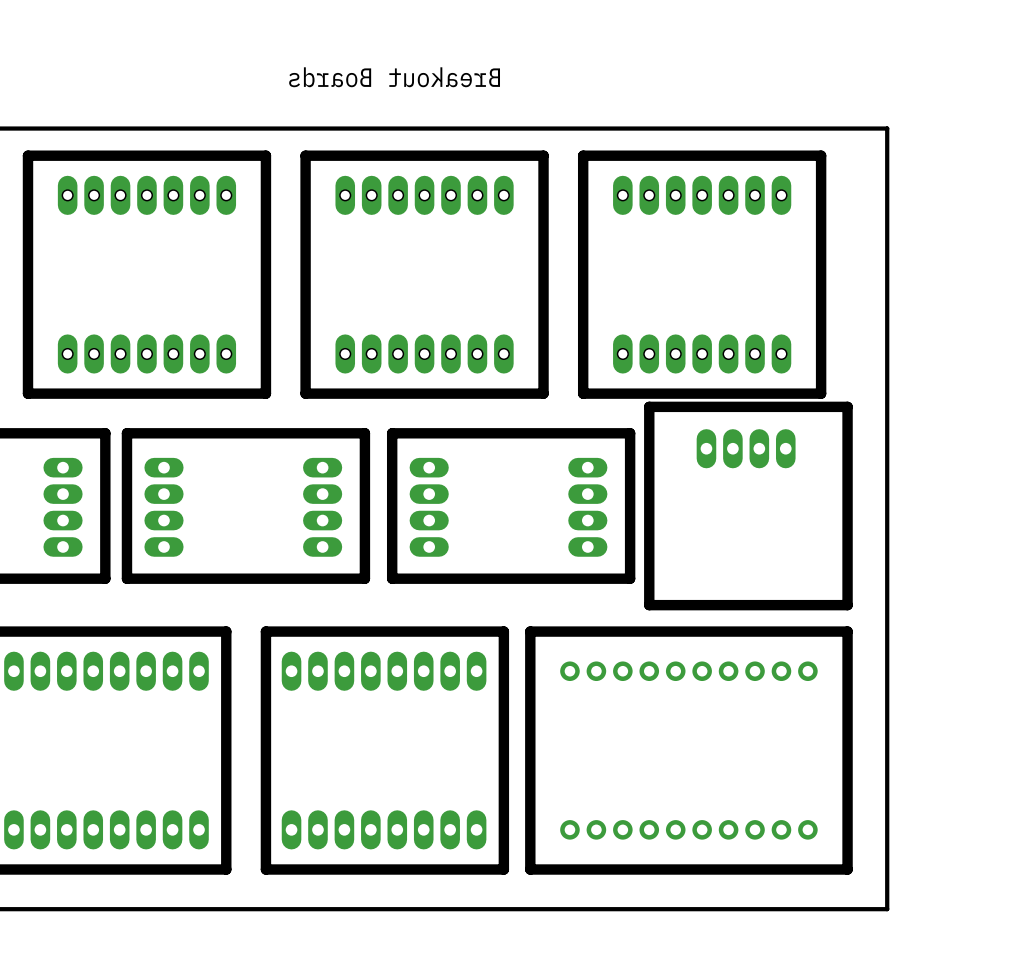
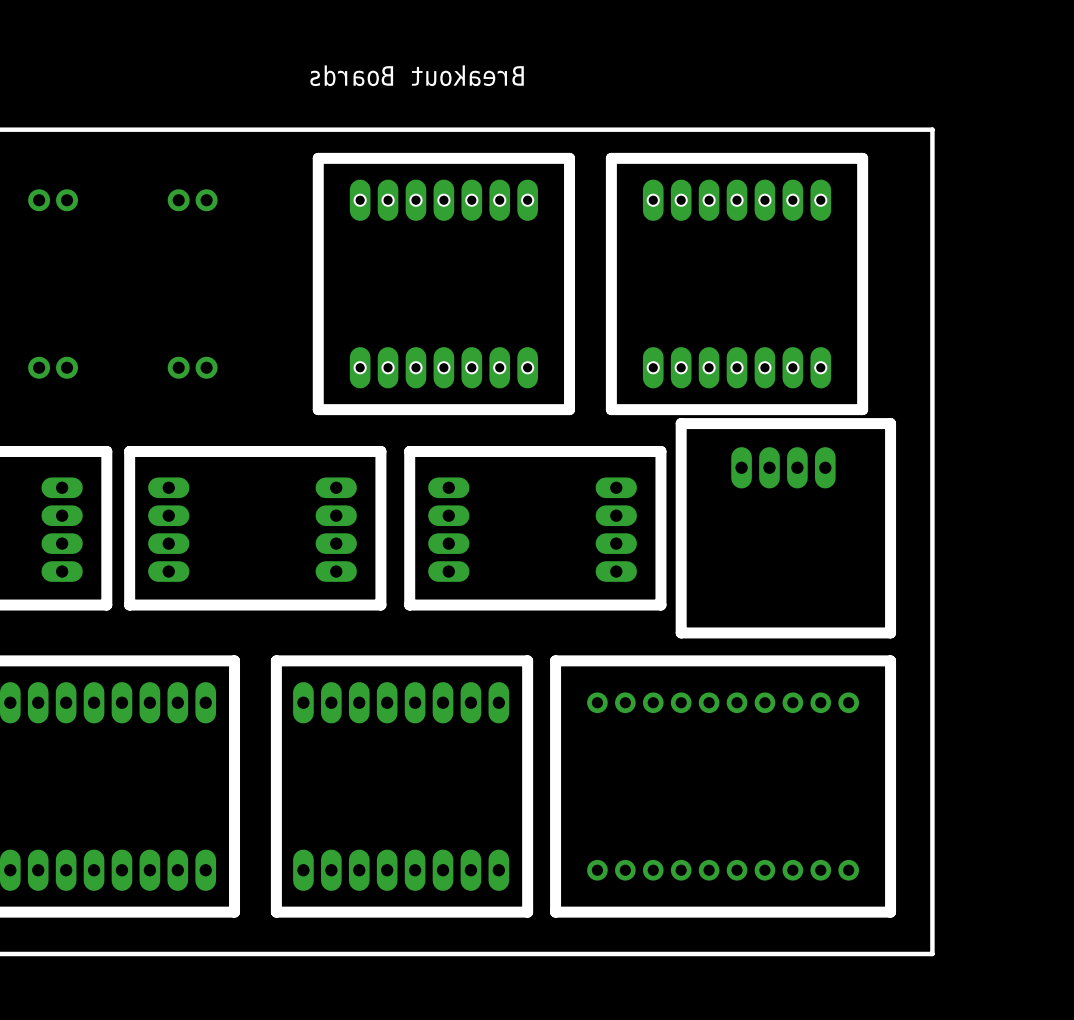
board edge: (265, 155) (27, 155) (27, 393) (265, 393) (265, 155) -> none
part: none -> (53, 200)
part: (146, 195) -> none
part: none -> (192, 200)
part: none -> (53, 367)
part: (146, 353) -> none
part: none -> (192, 367)

